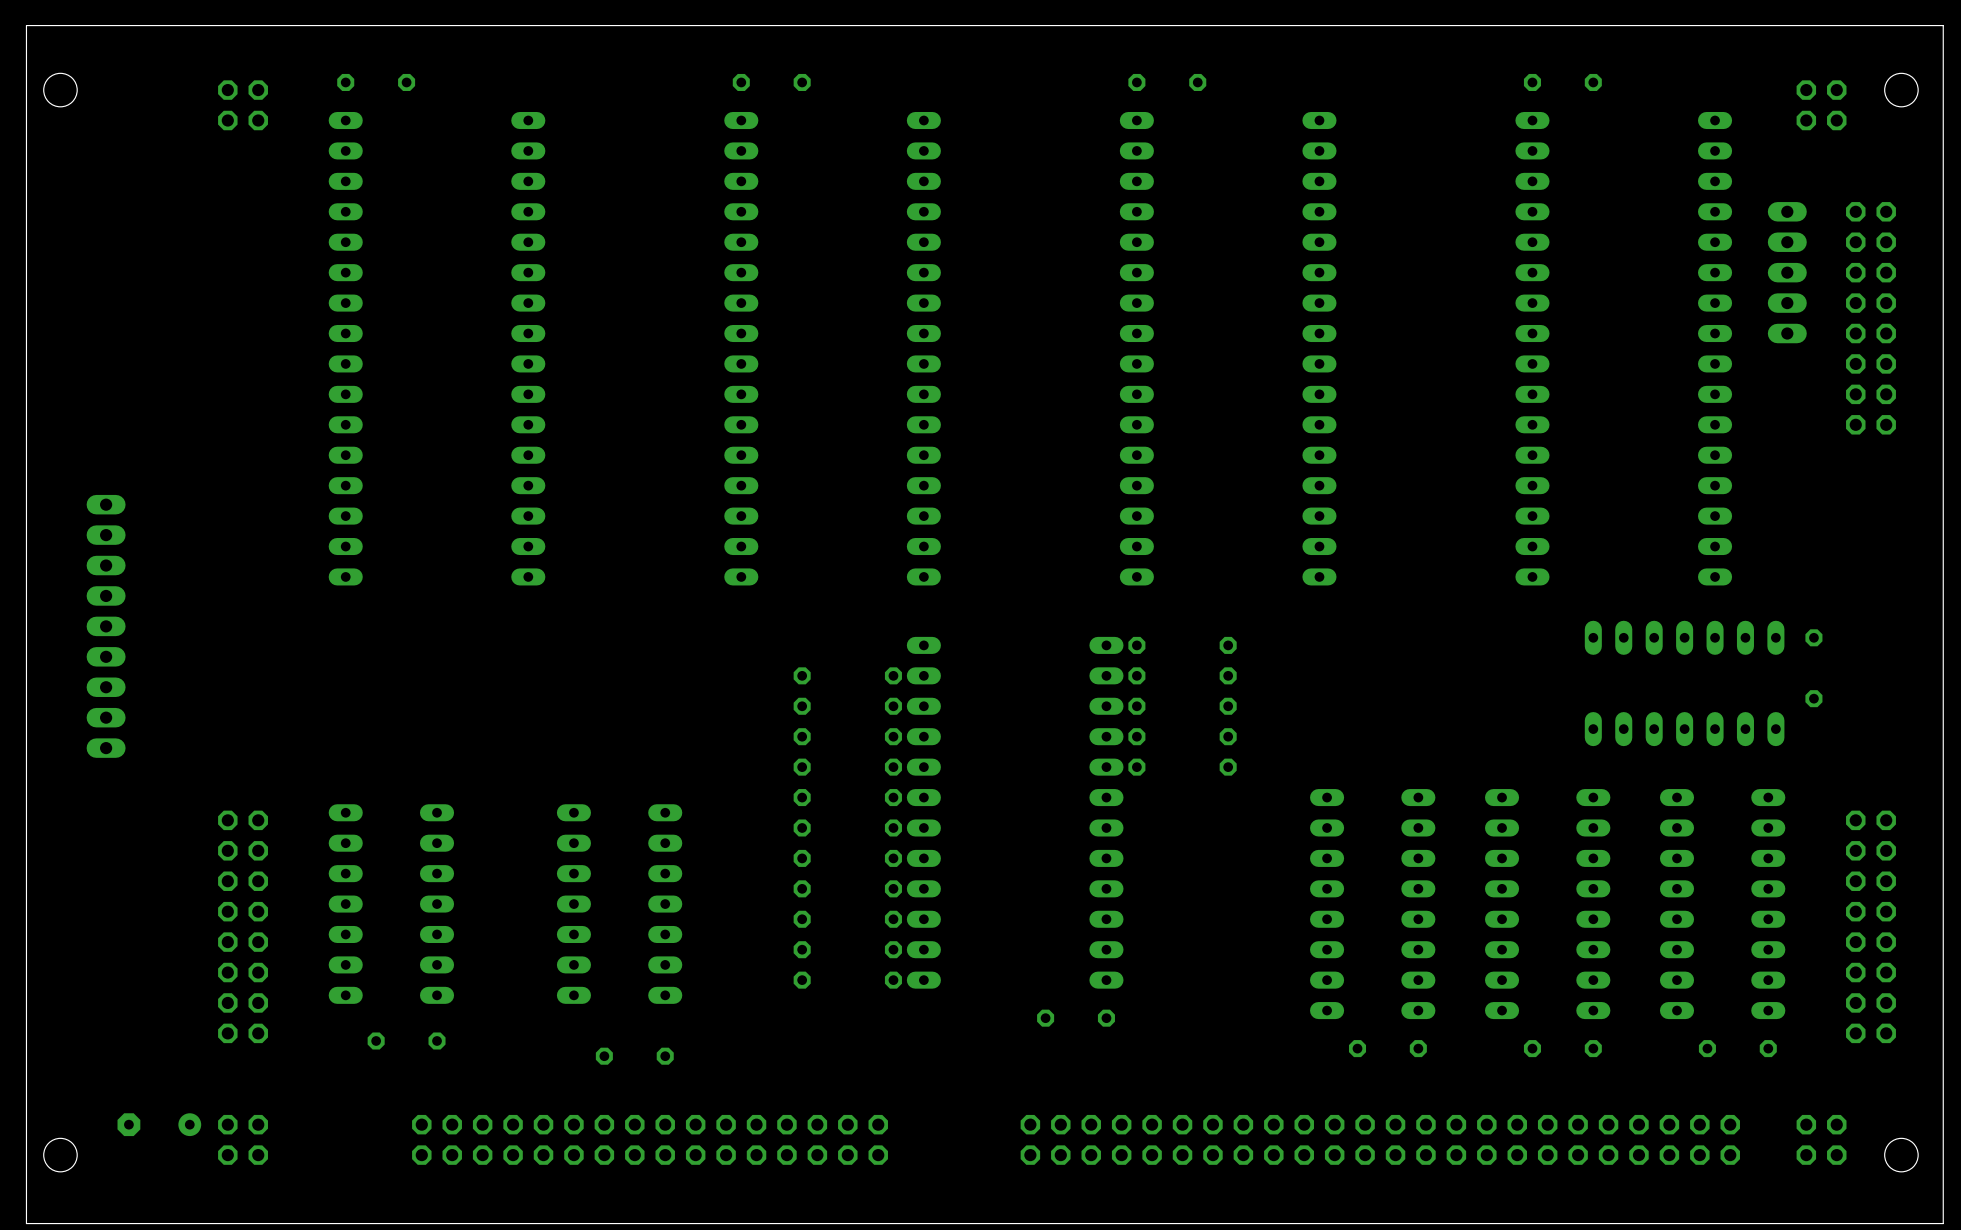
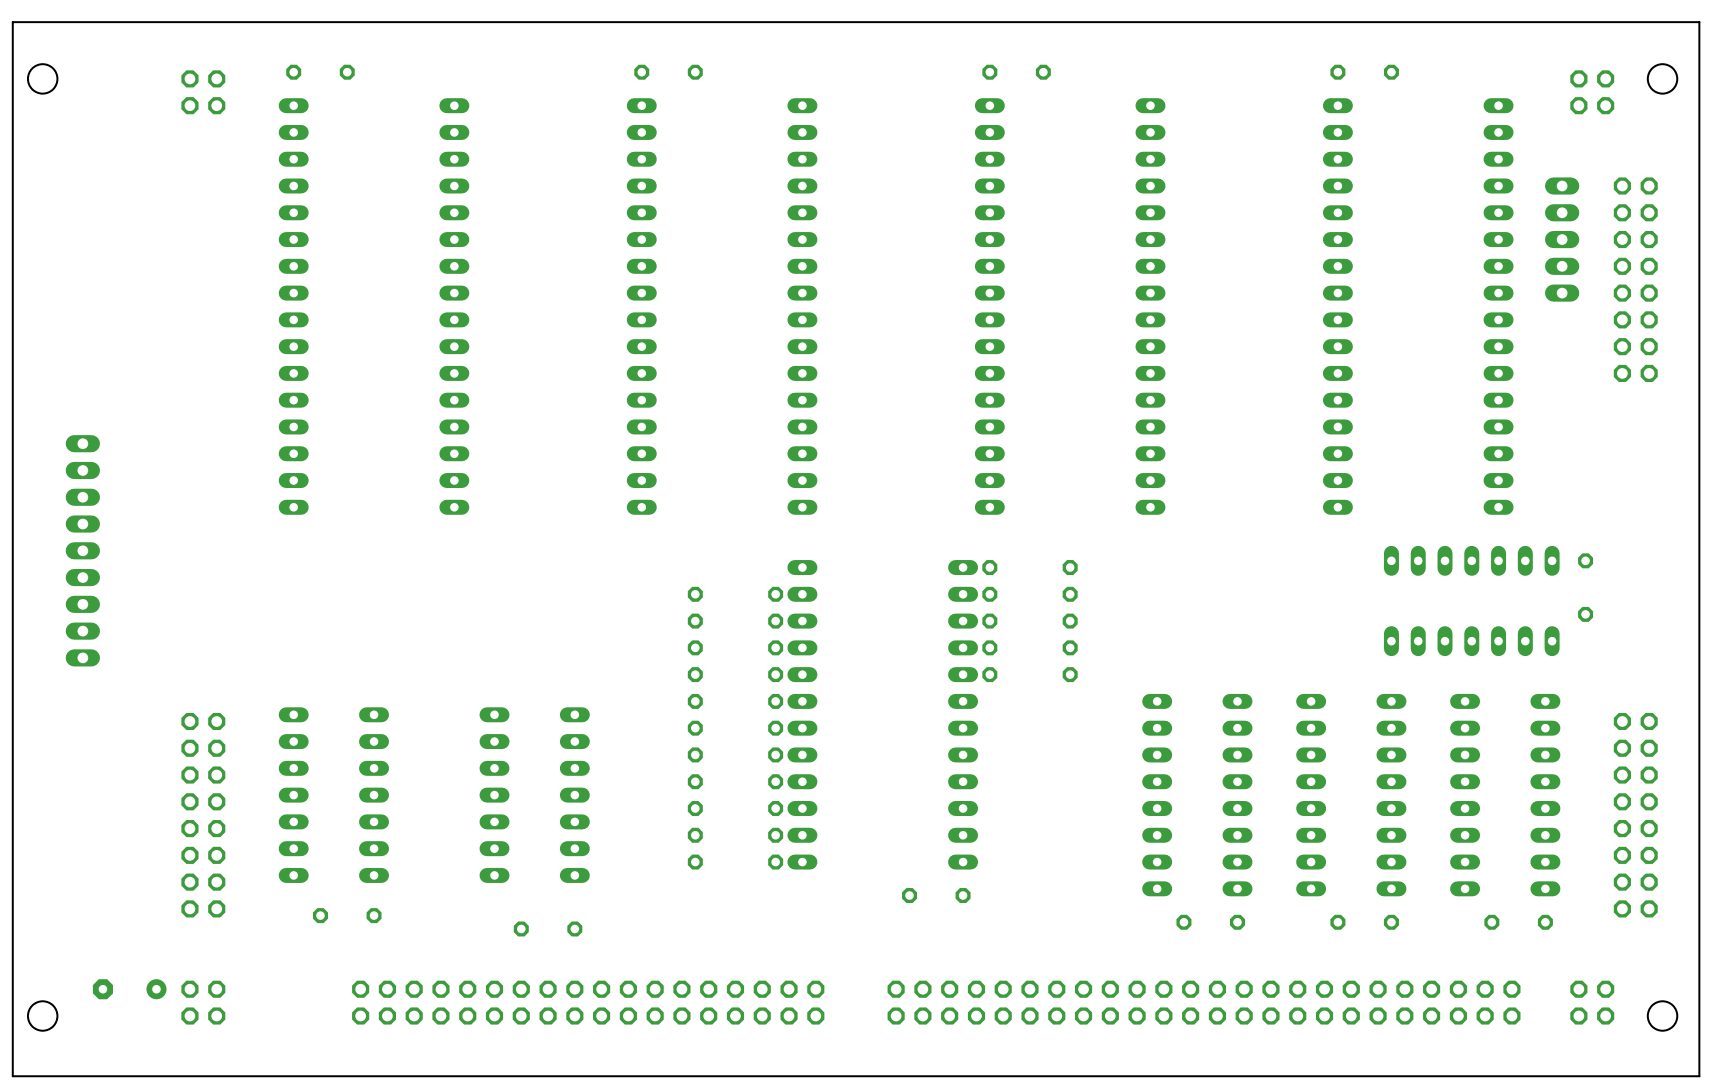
part: none -> (588, 1002)

